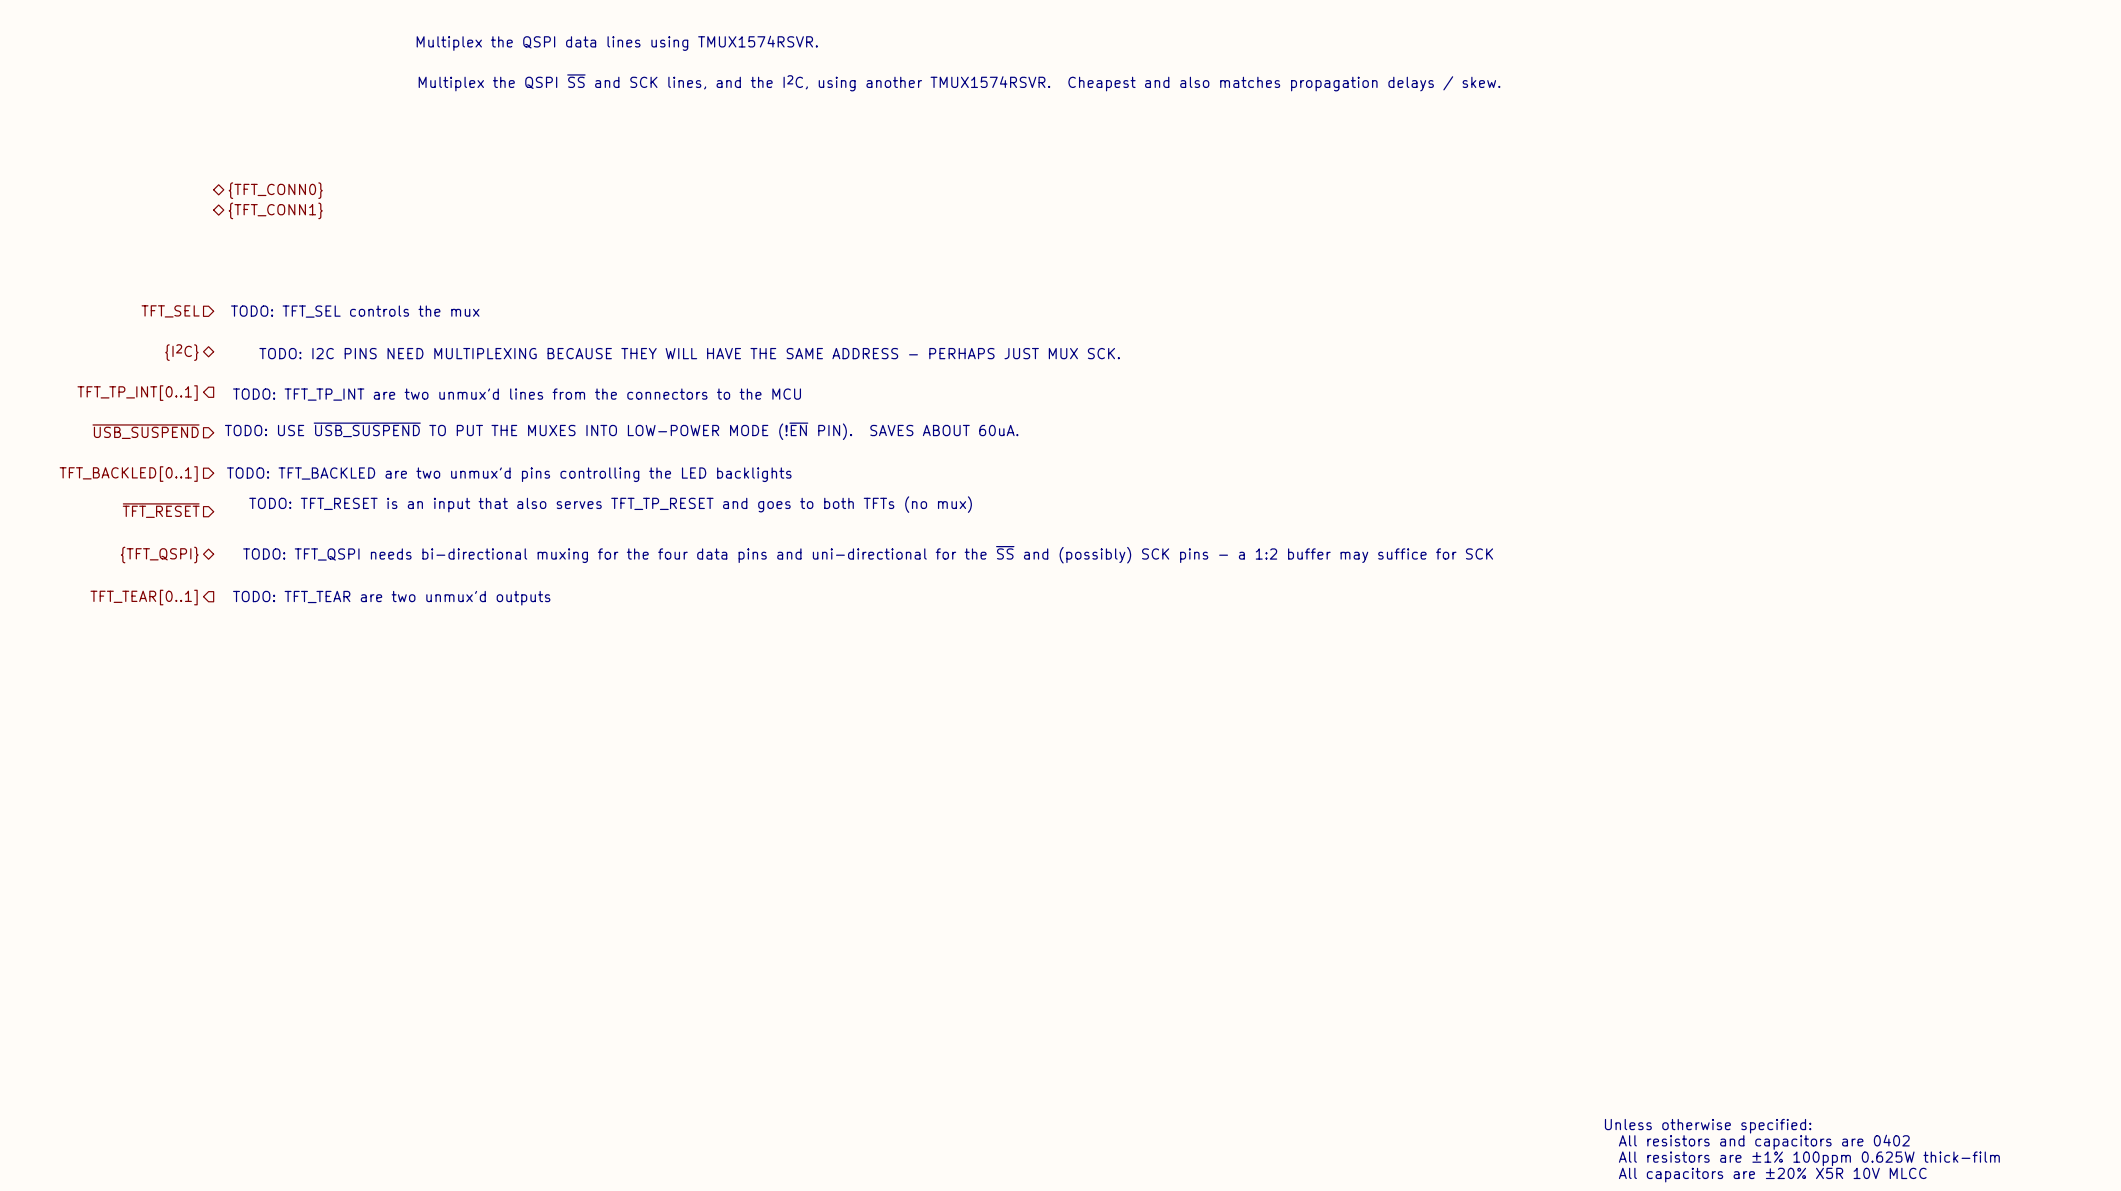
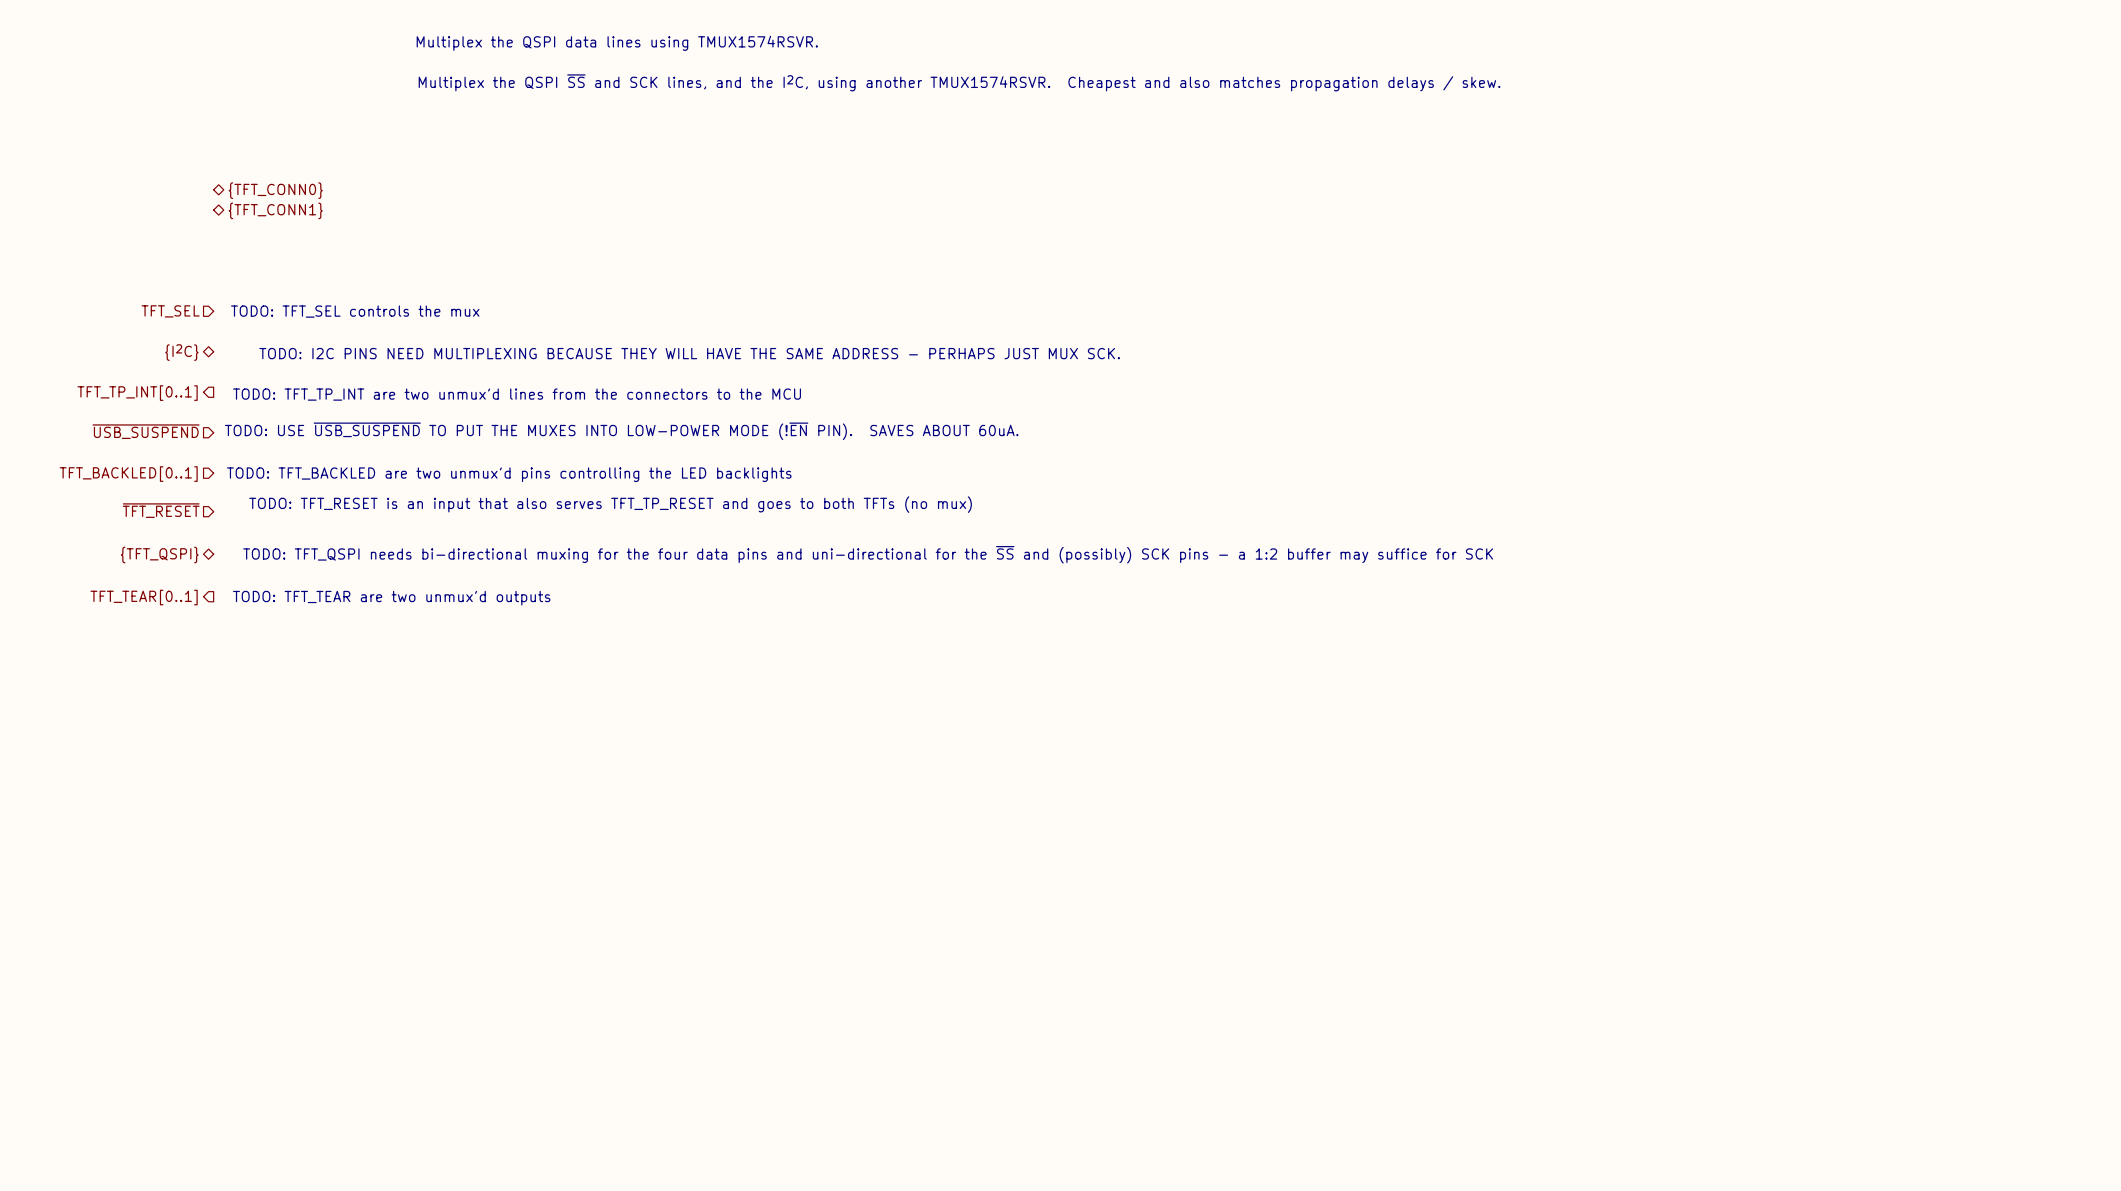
text: Unless otherwise specified: (1708, 1126) -> none
text: All resistors and capacitors are 0402 (1764, 1142) -> none
text: All resistors are ±1% 100ppm 0.625W thick-film (1809, 1158) -> none
text: All capacitors are ±20% X5R 10V MLCC (1772, 1175) -> none

